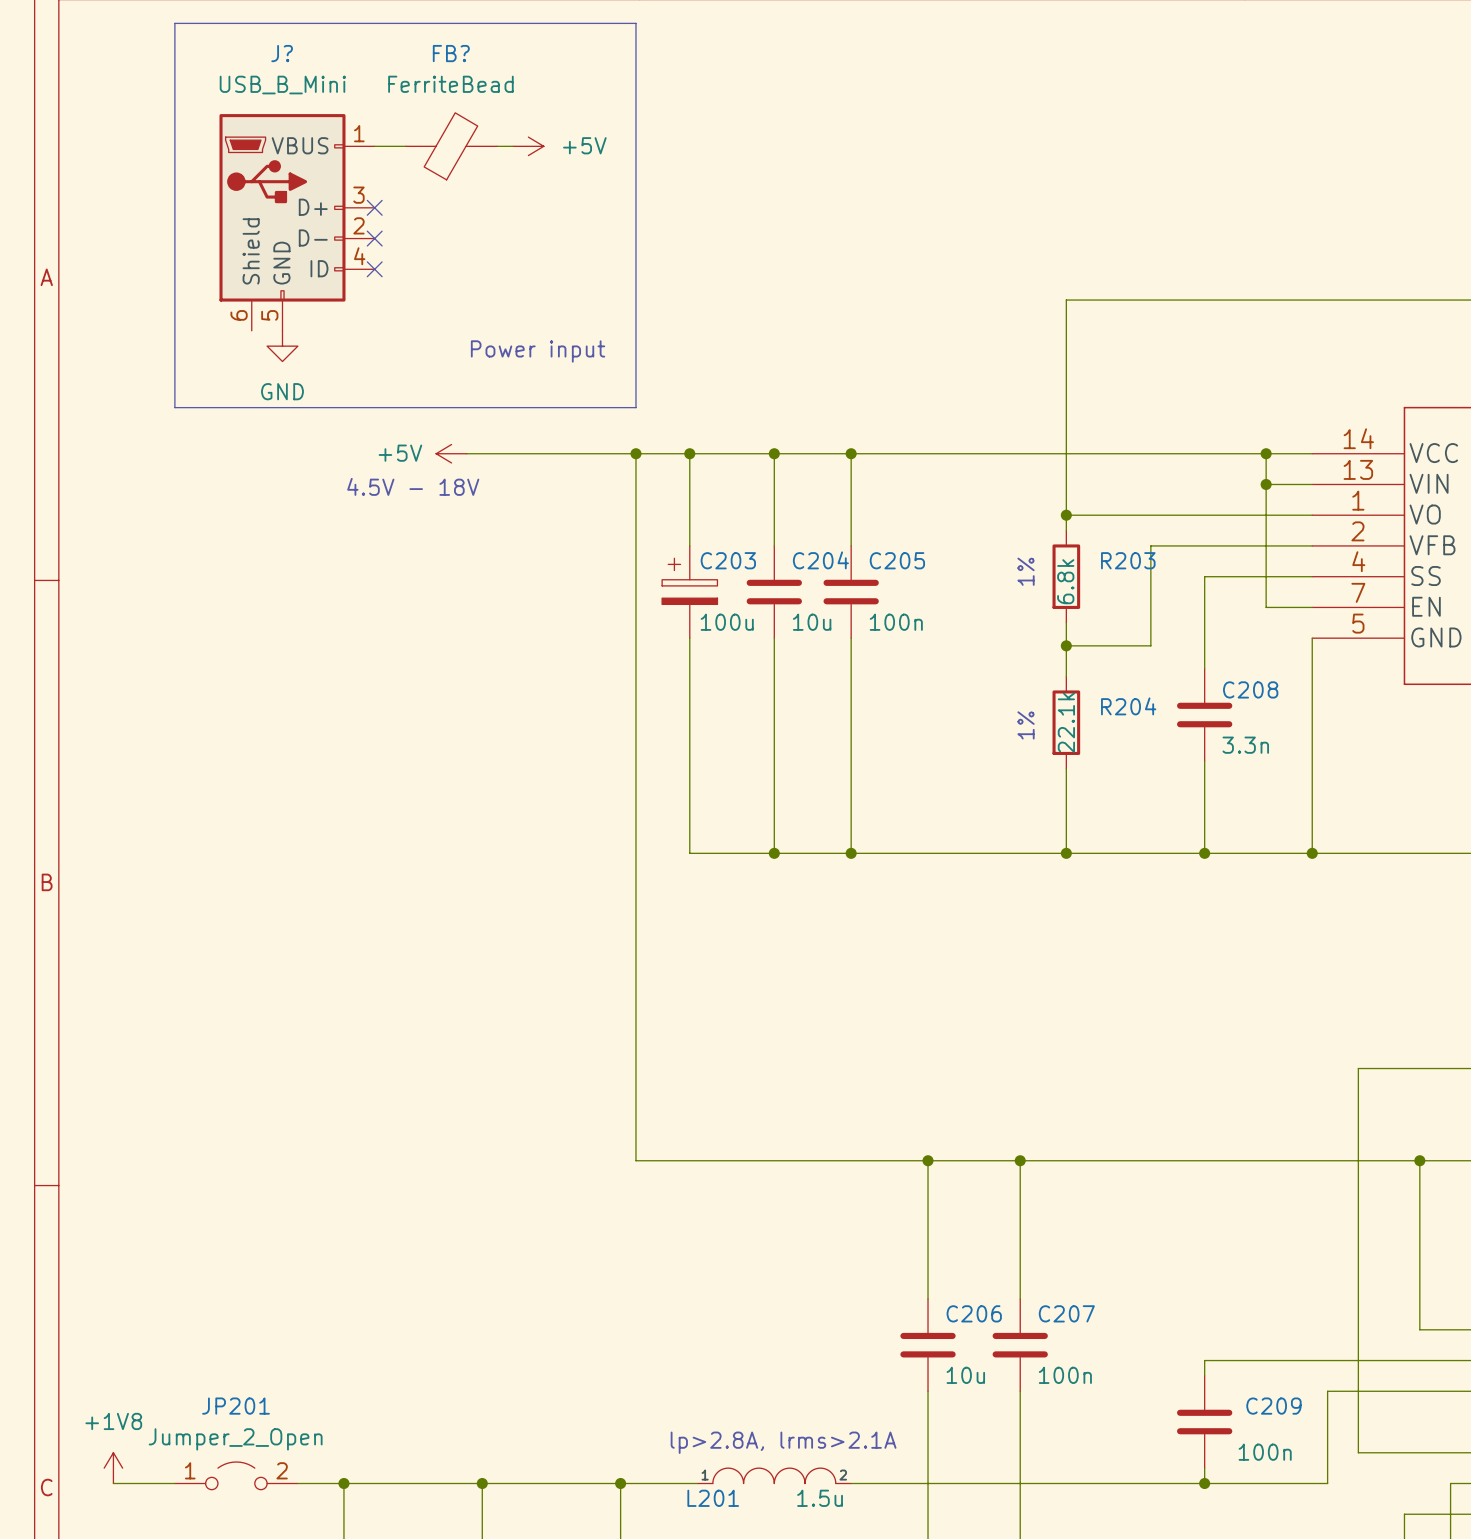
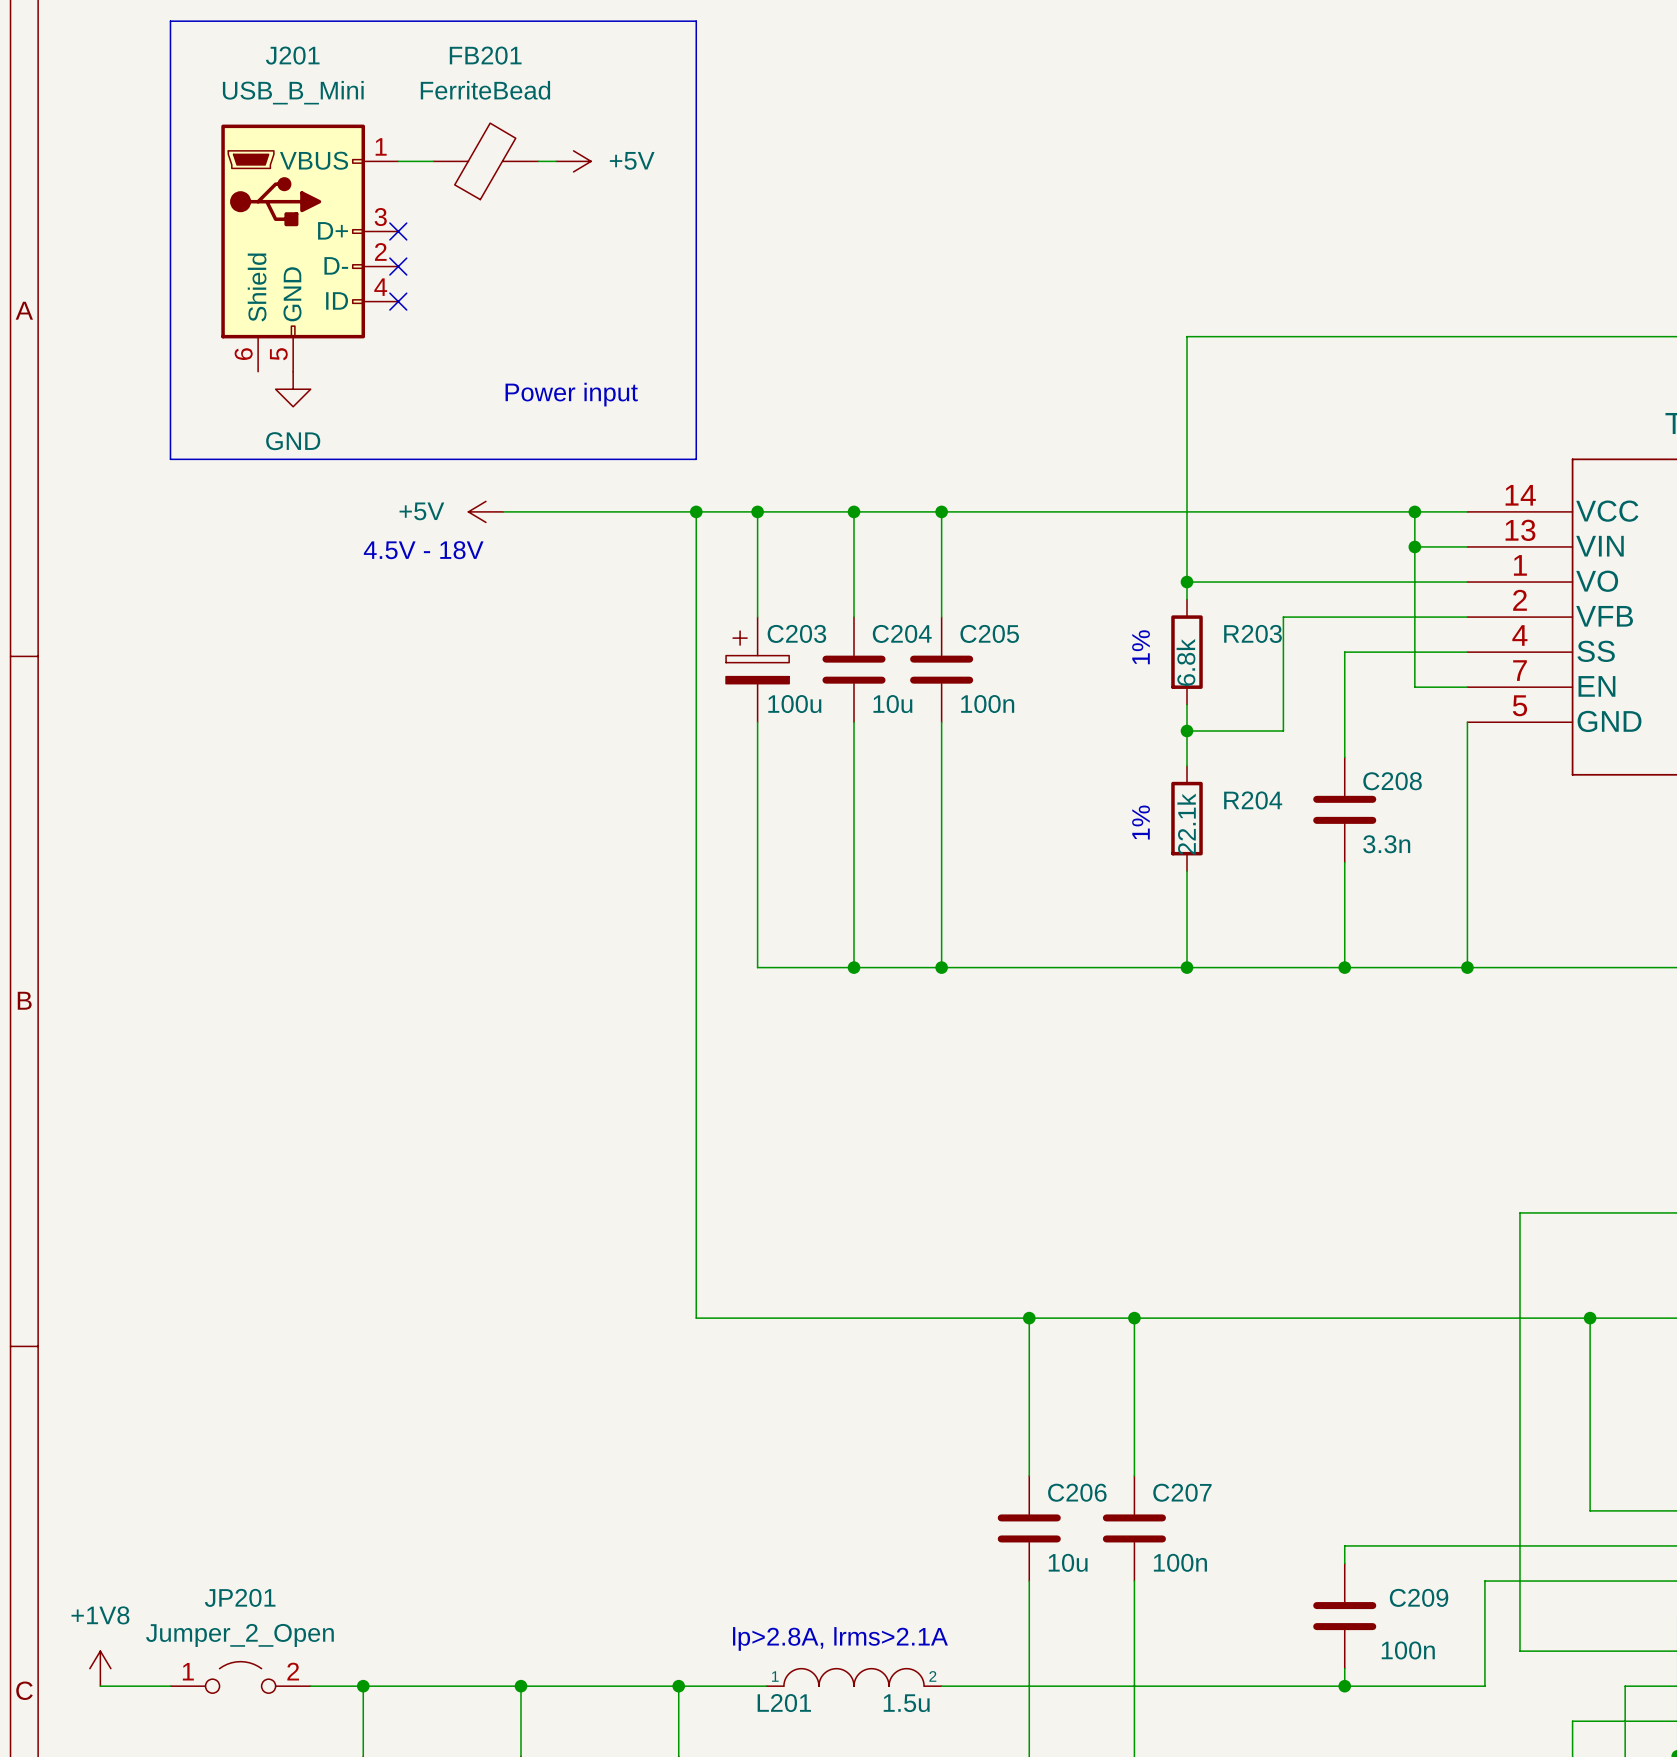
J? name: J? (282, 53) -> J201 (292, 55)
FB? name: FB? (451, 53) -> FB201 (485, 55)

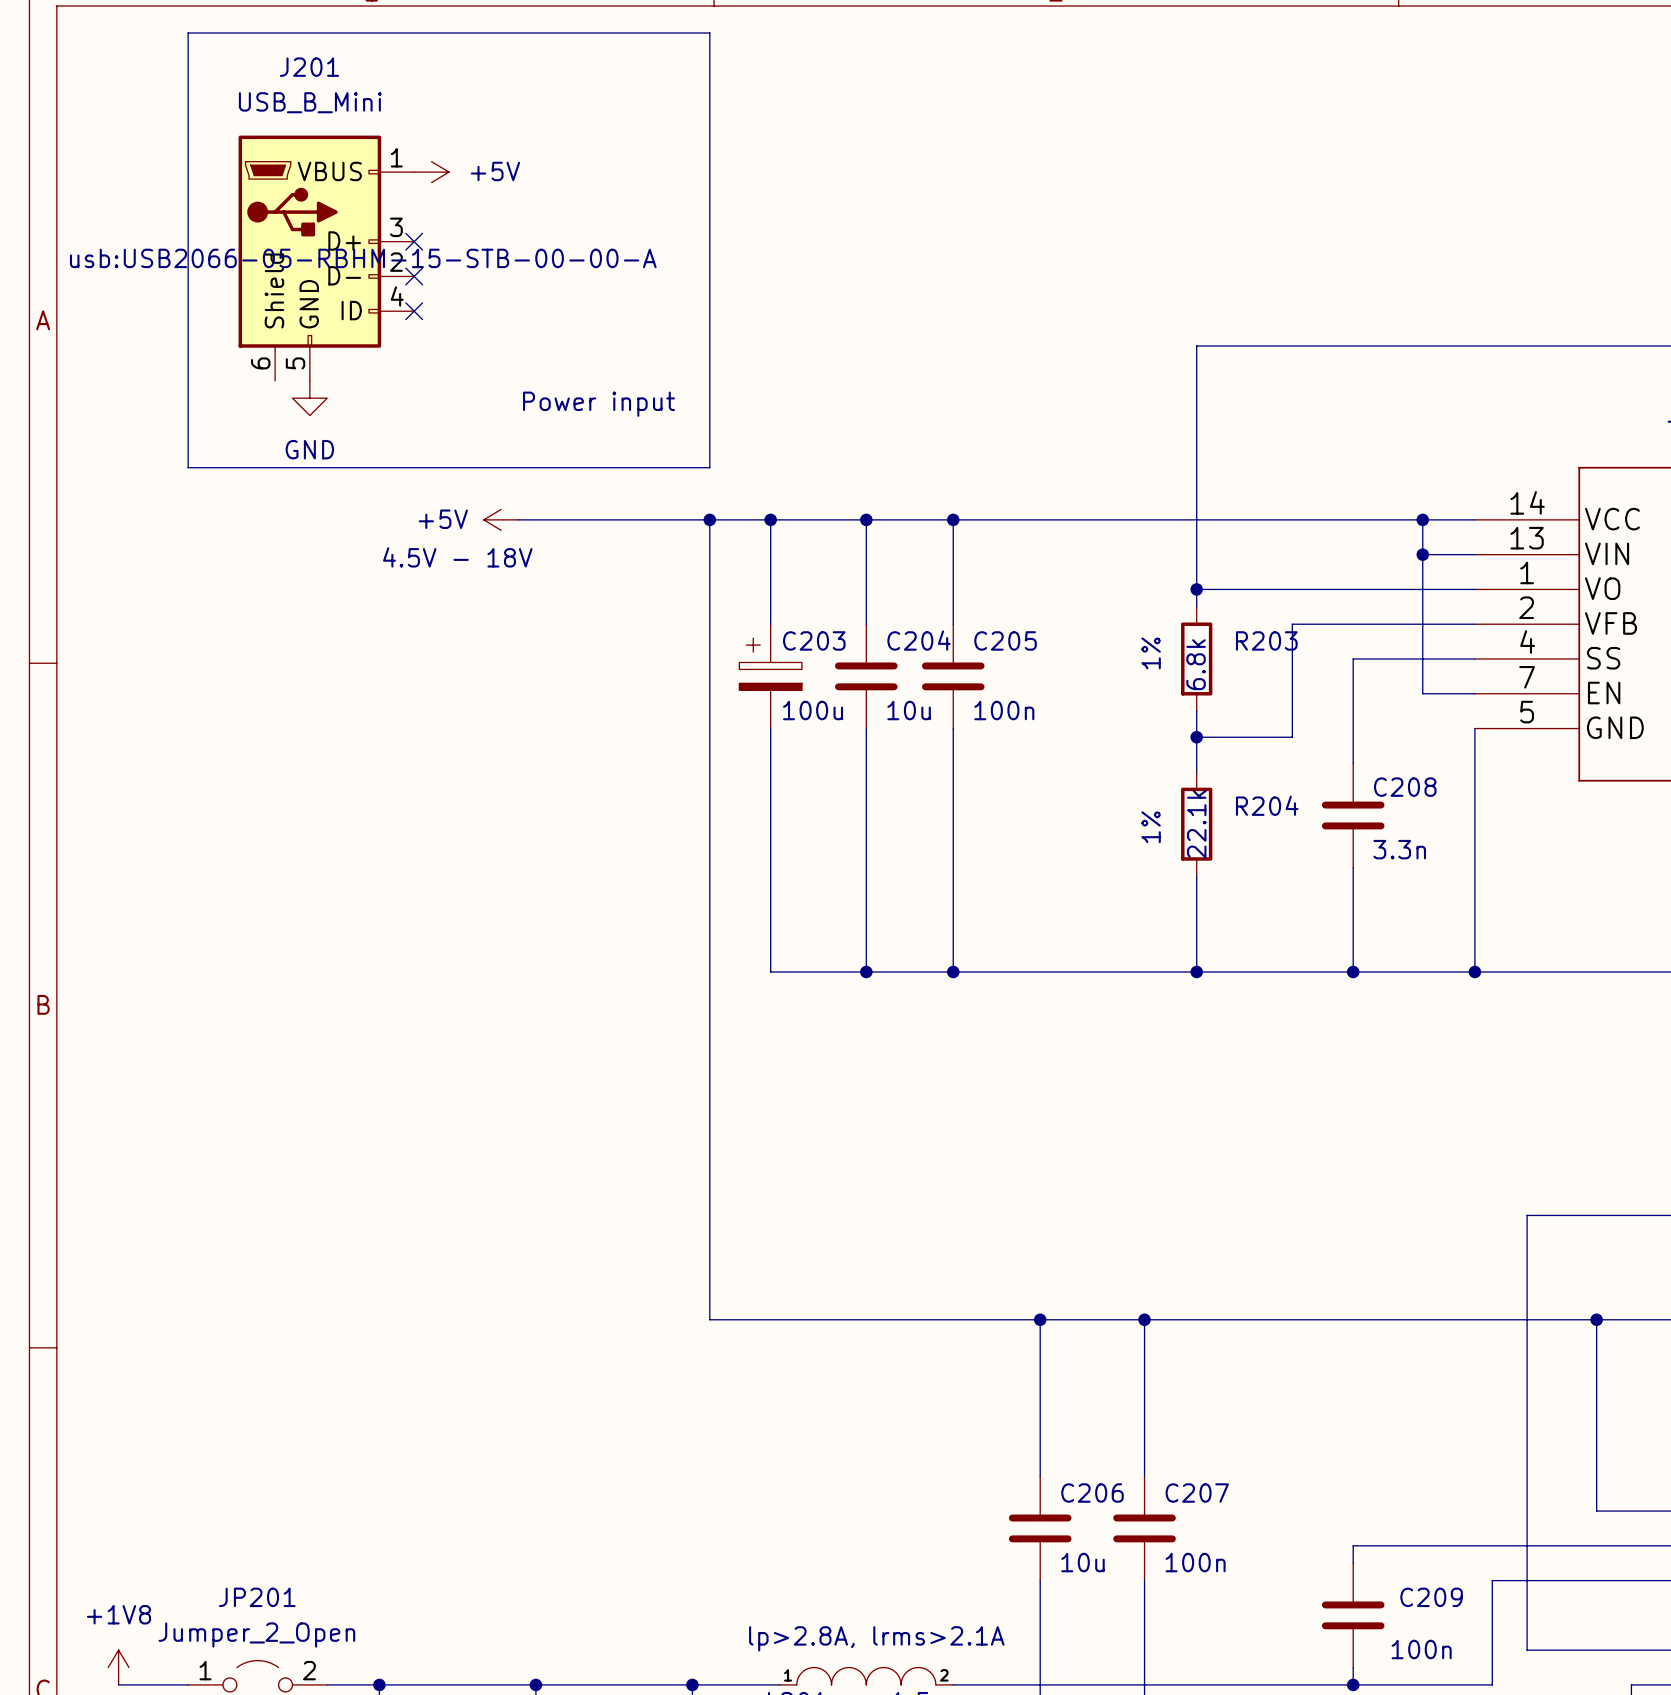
FB201: FerriteBead (485, 161) -> none
wire: (538, 161) (556, 161) -> none
power symbol position: +5V (573, 161) -> +5V (431, 172)
J201 text: none -> usb:USB2066-05-RBHM-15-STB-00-00-A (363, 258)

